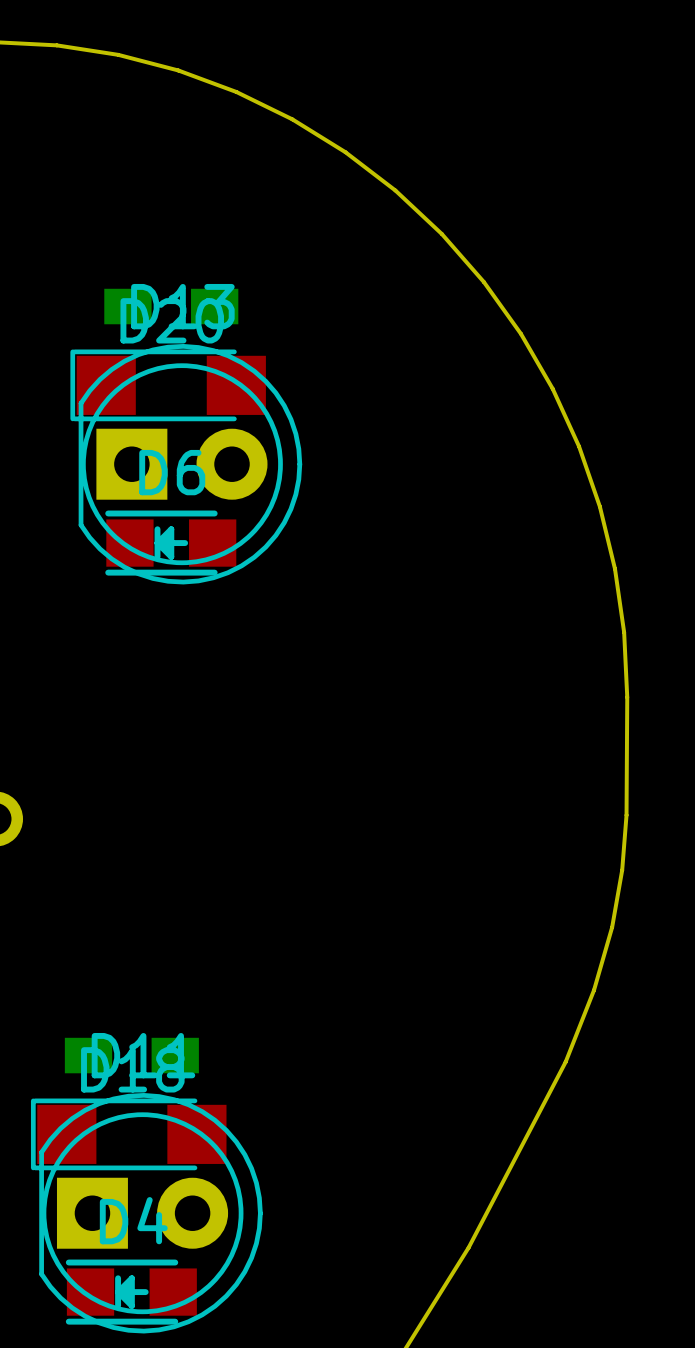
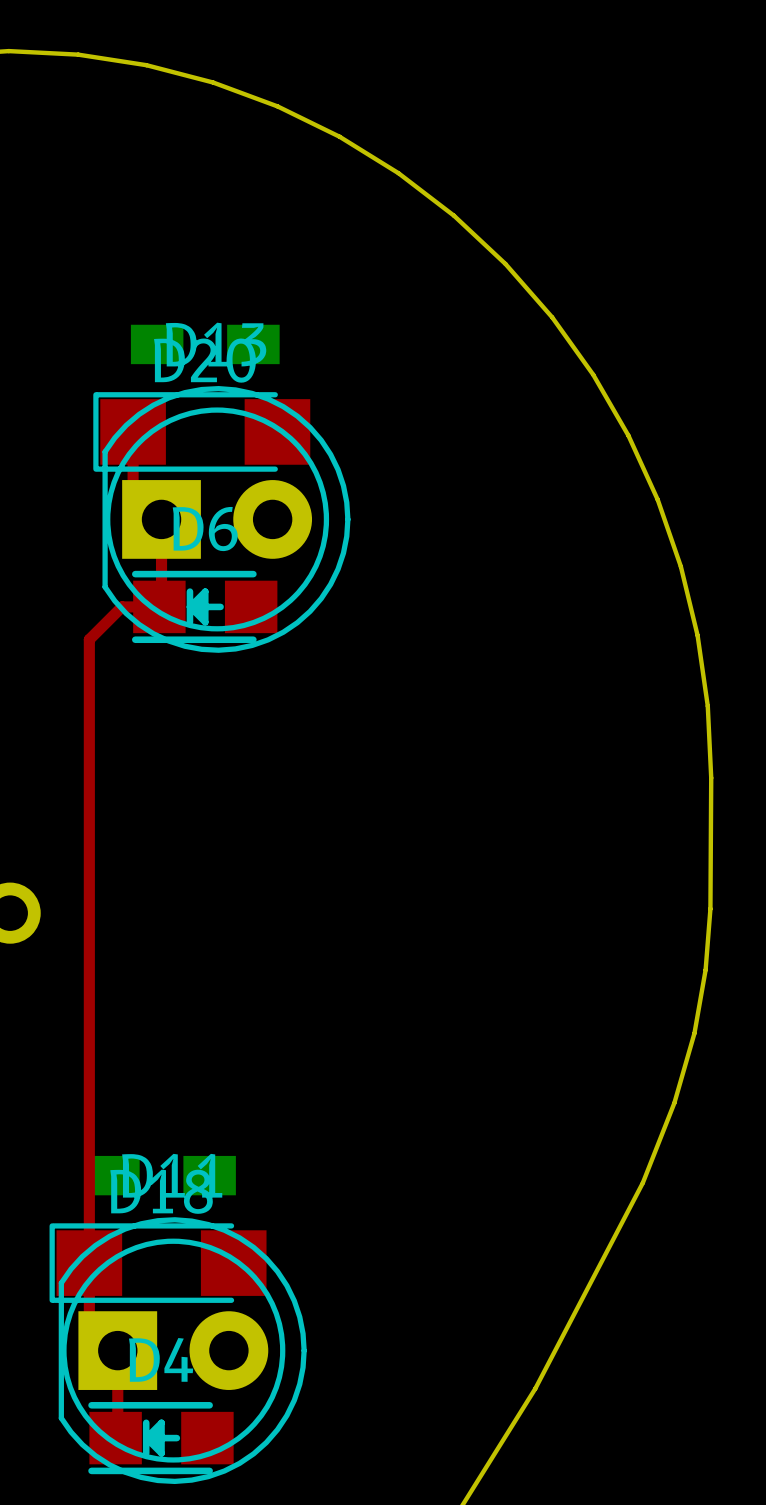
top track: none -> (133, 431) (133, 491) (161, 519) (161, 604) (159, 606) (122, 606) (89, 639) (89, 1322) (117, 1350) (117, 1435) (115, 1438)

